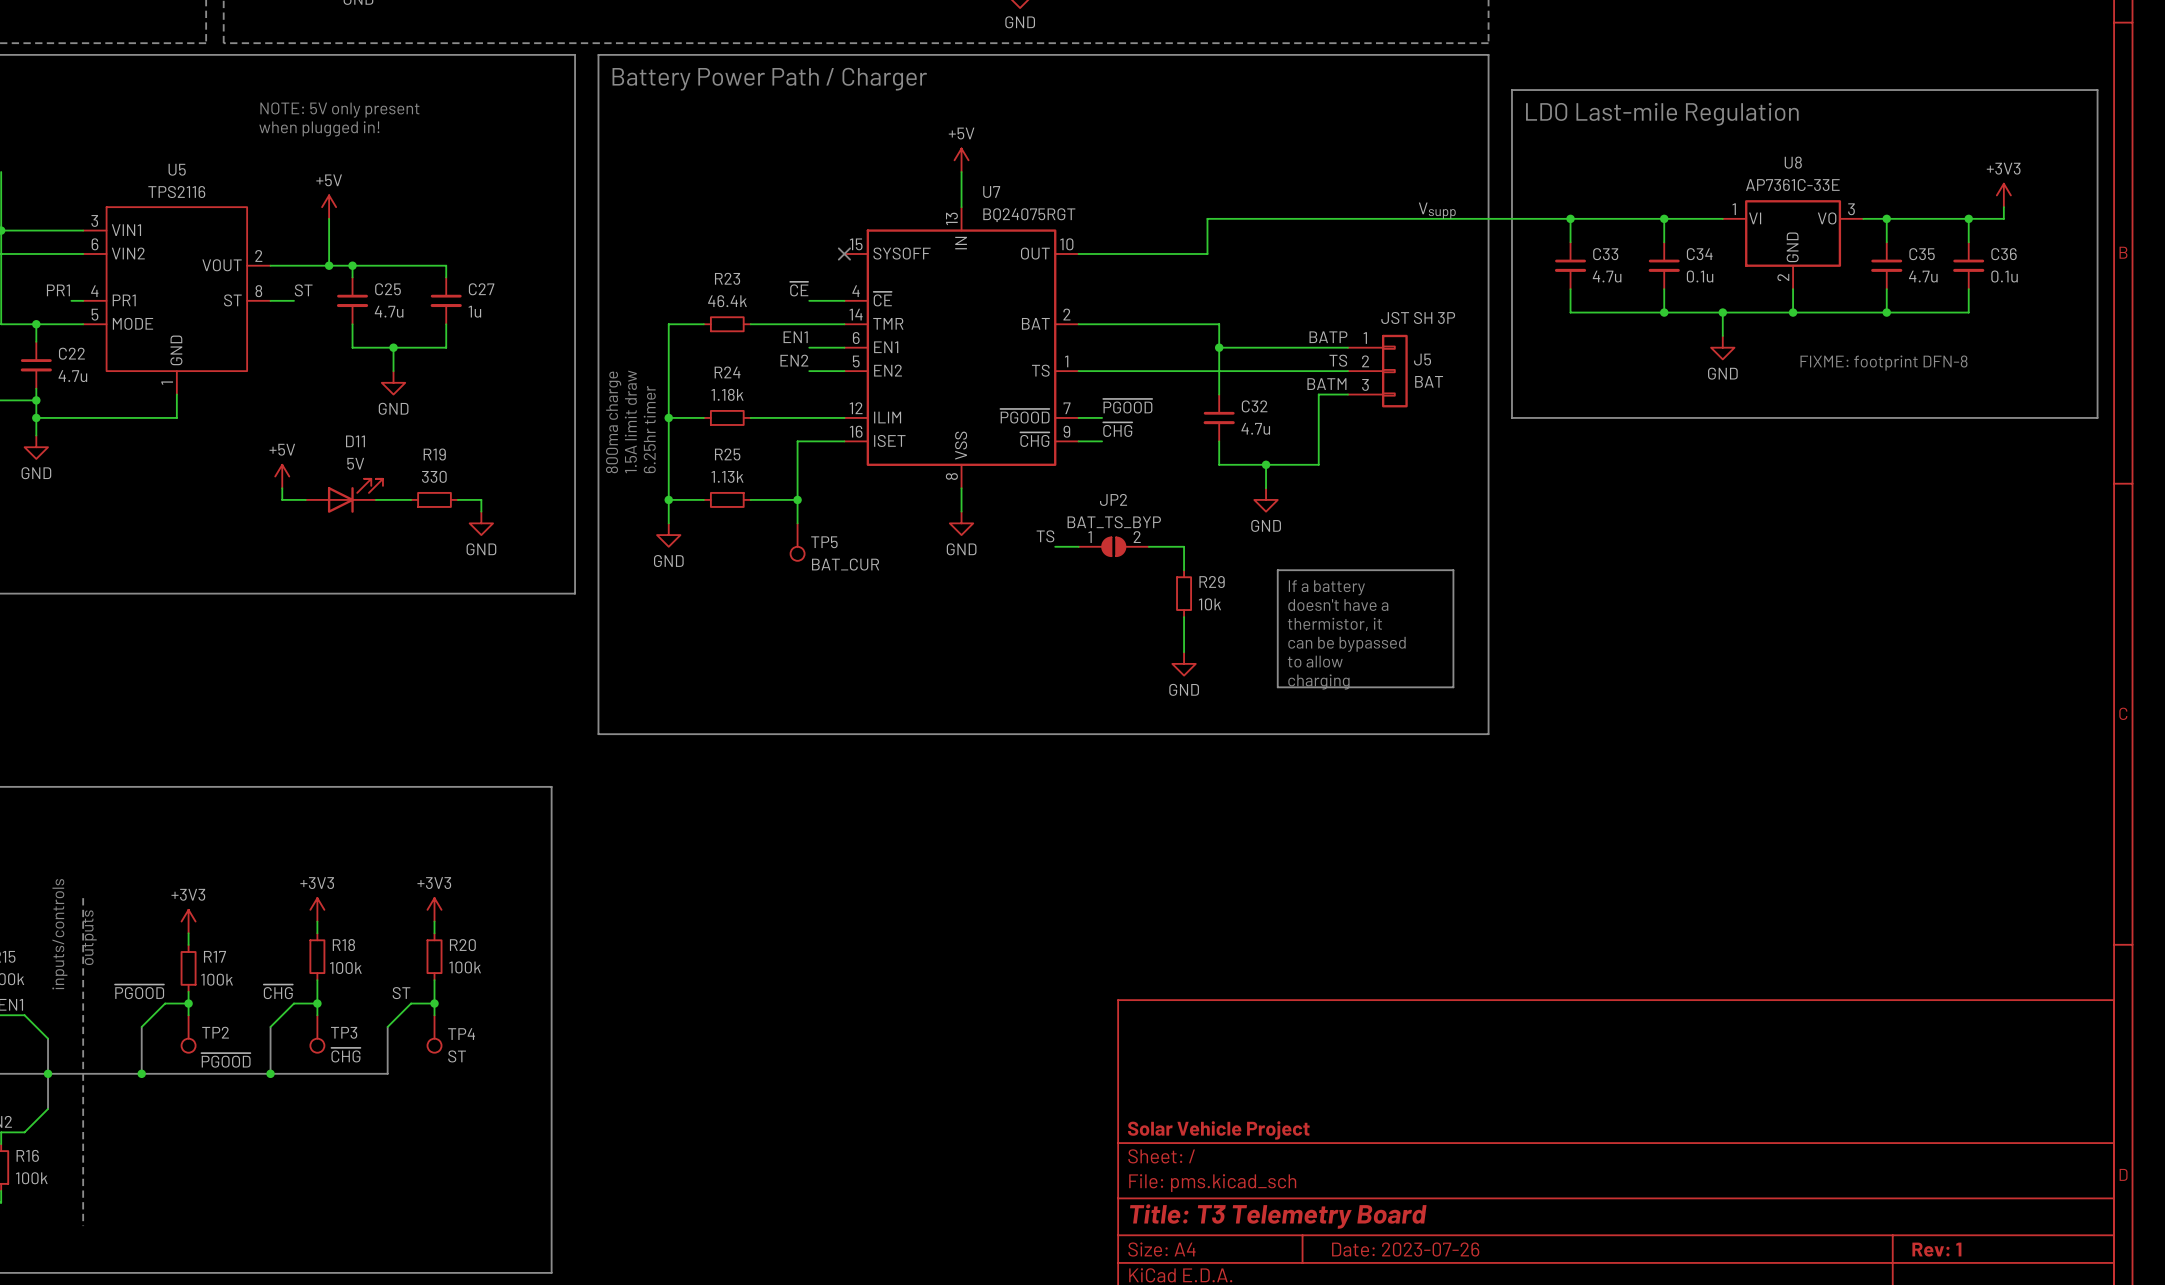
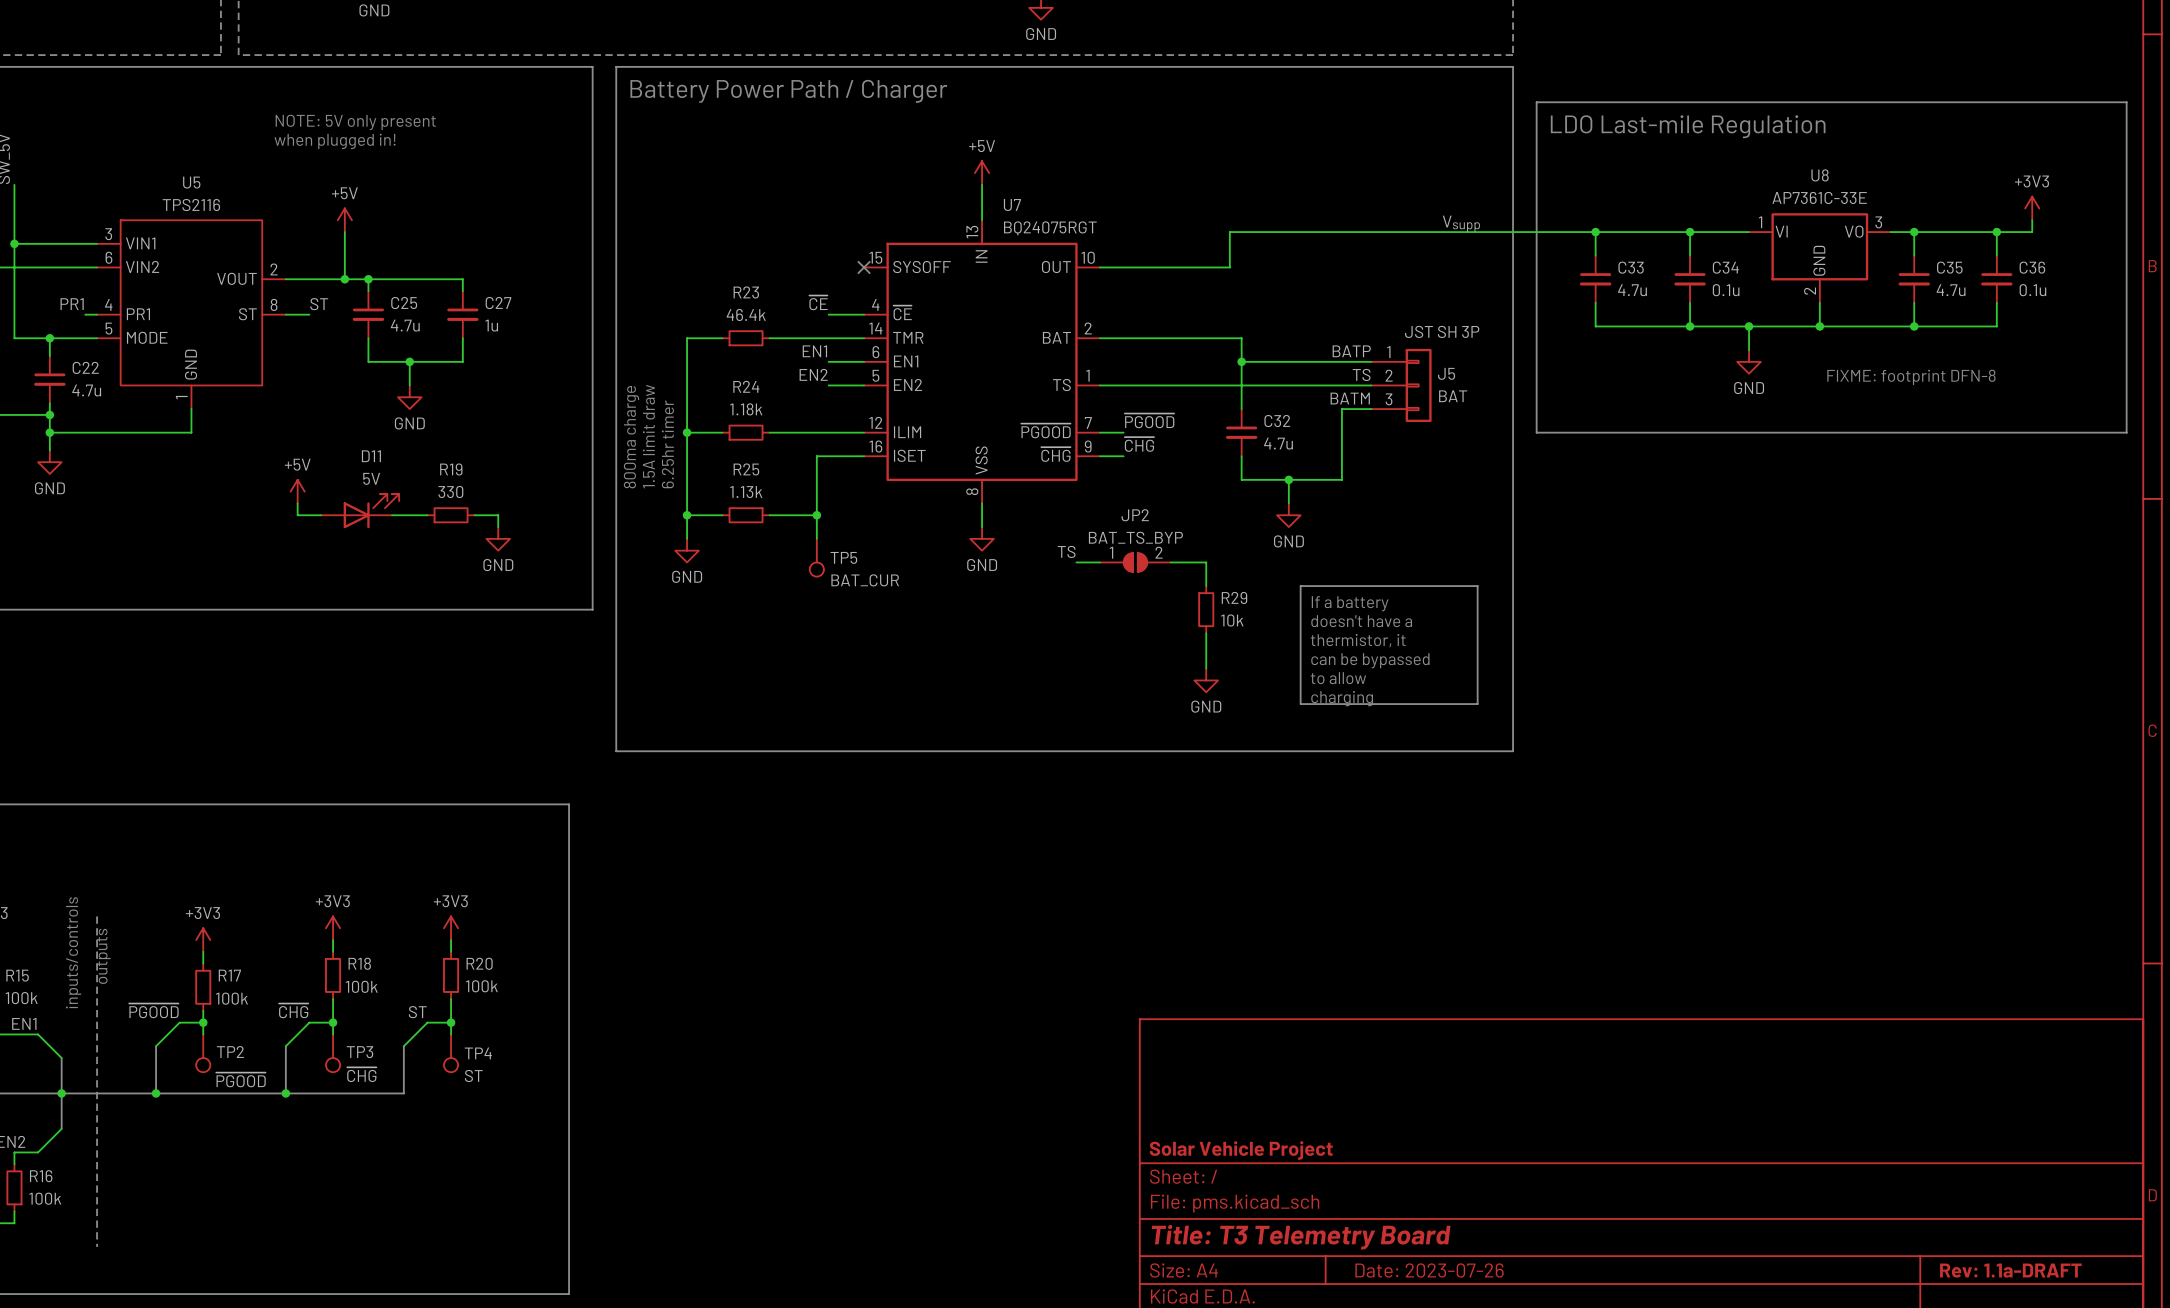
title block: Rev: 1 (1936, 1249) -> Rev: 1.1a-DRAFT (2010, 1270)

